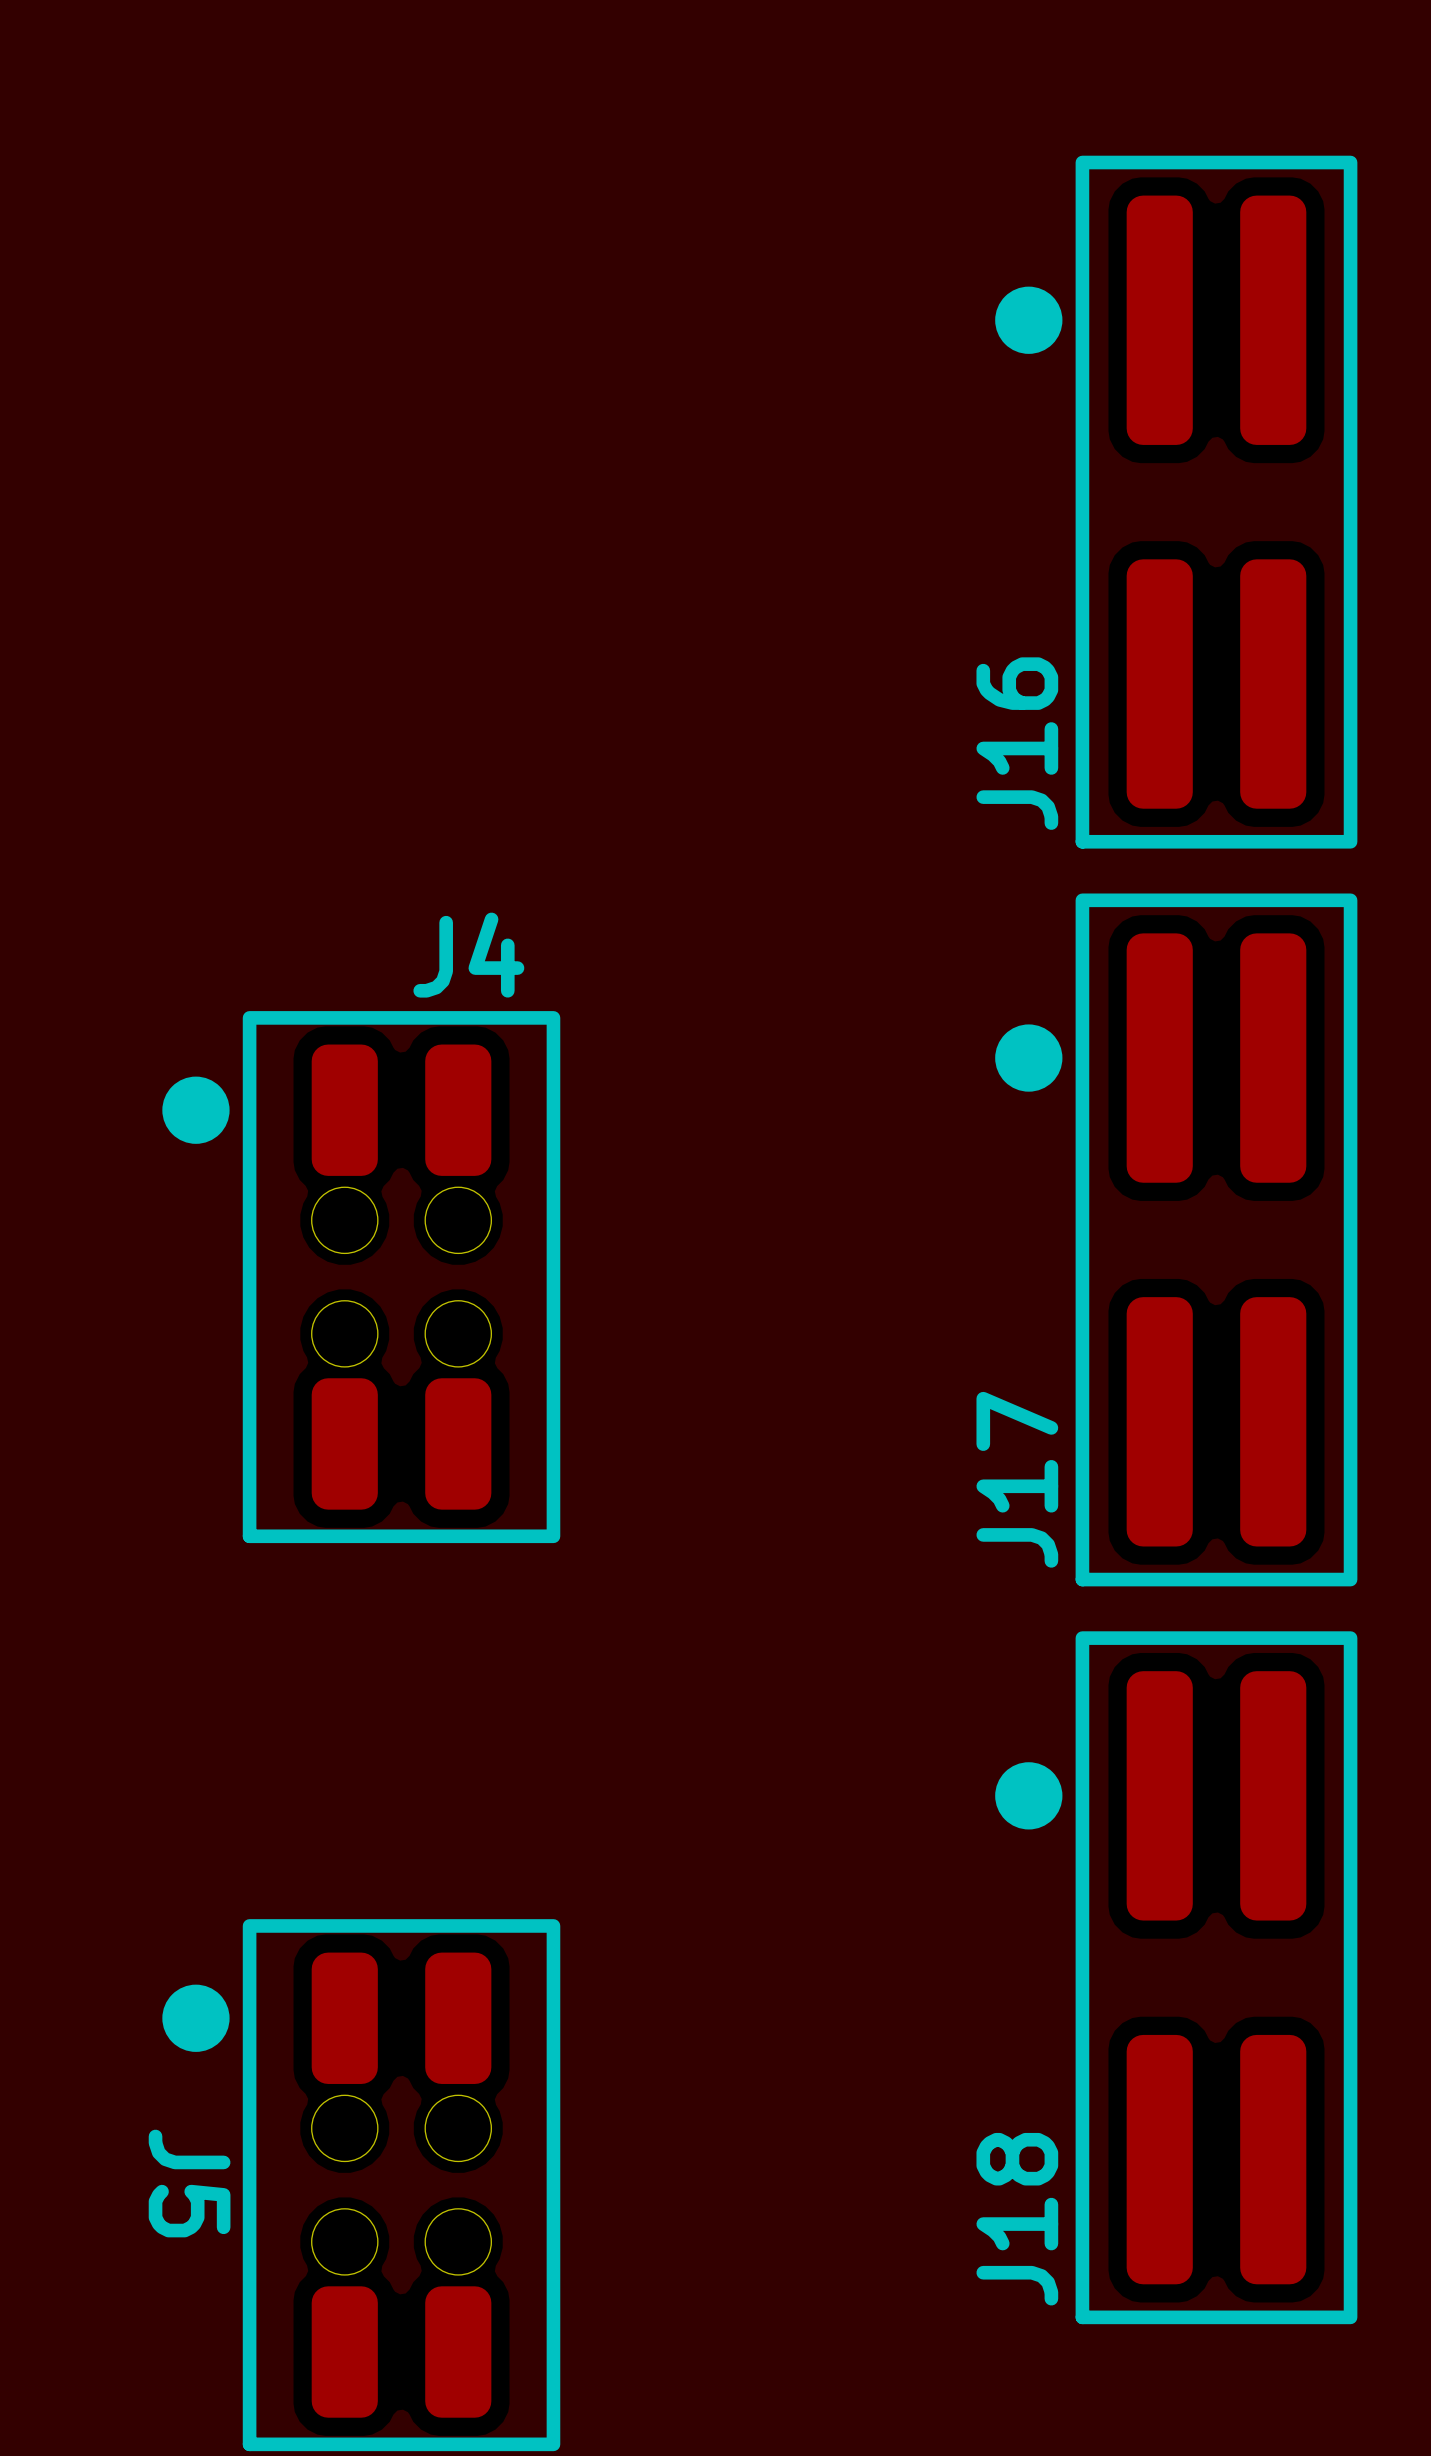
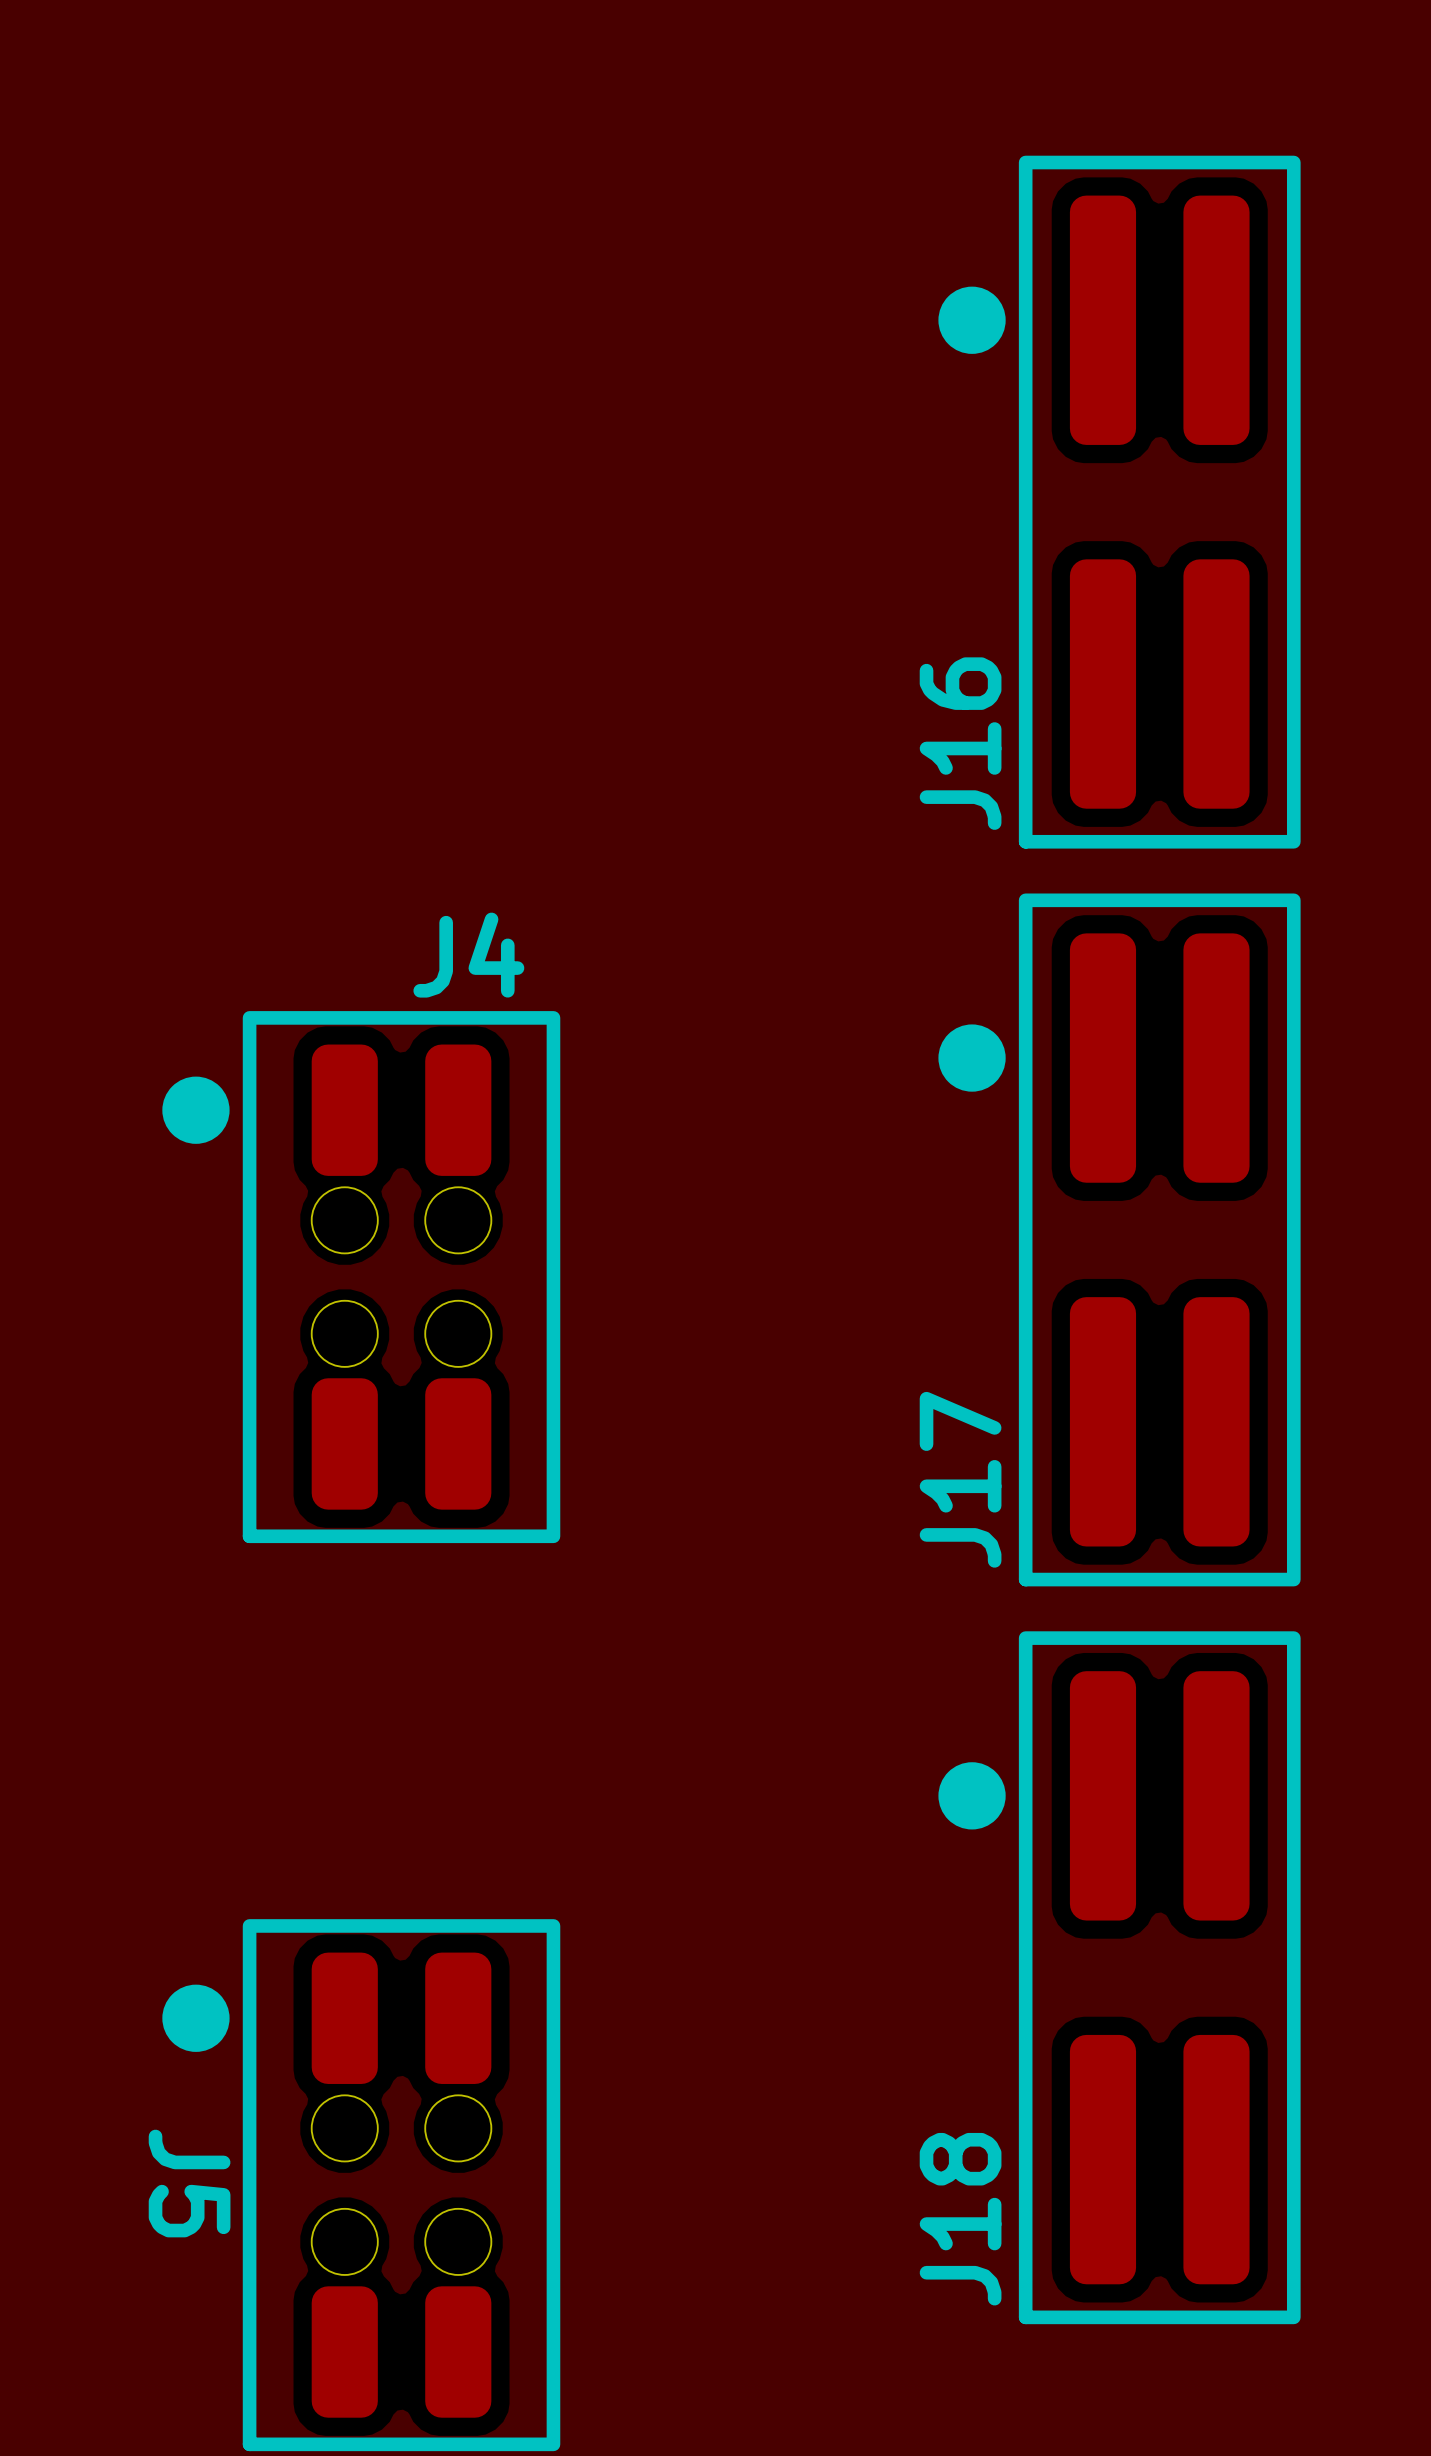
J16 position: (1176, 502) -> (1119, 502)
J17 position: (1176, 1239) -> (1119, 1239)
J18 position: (1176, 1977) -> (1119, 1977)

